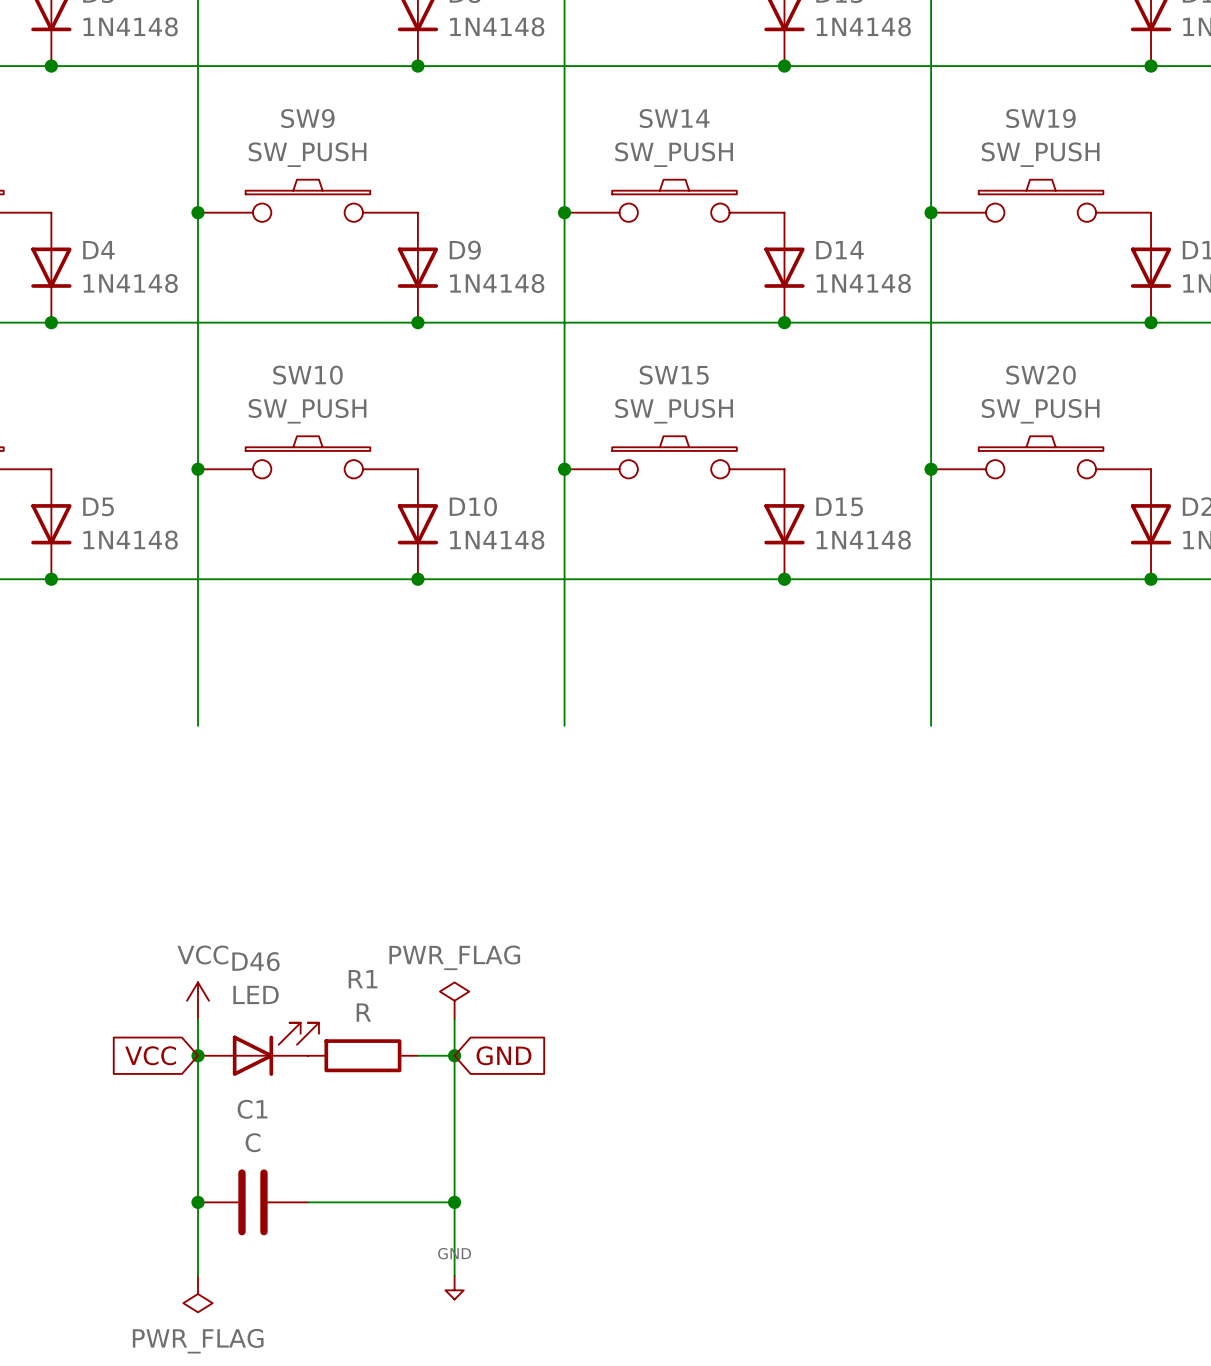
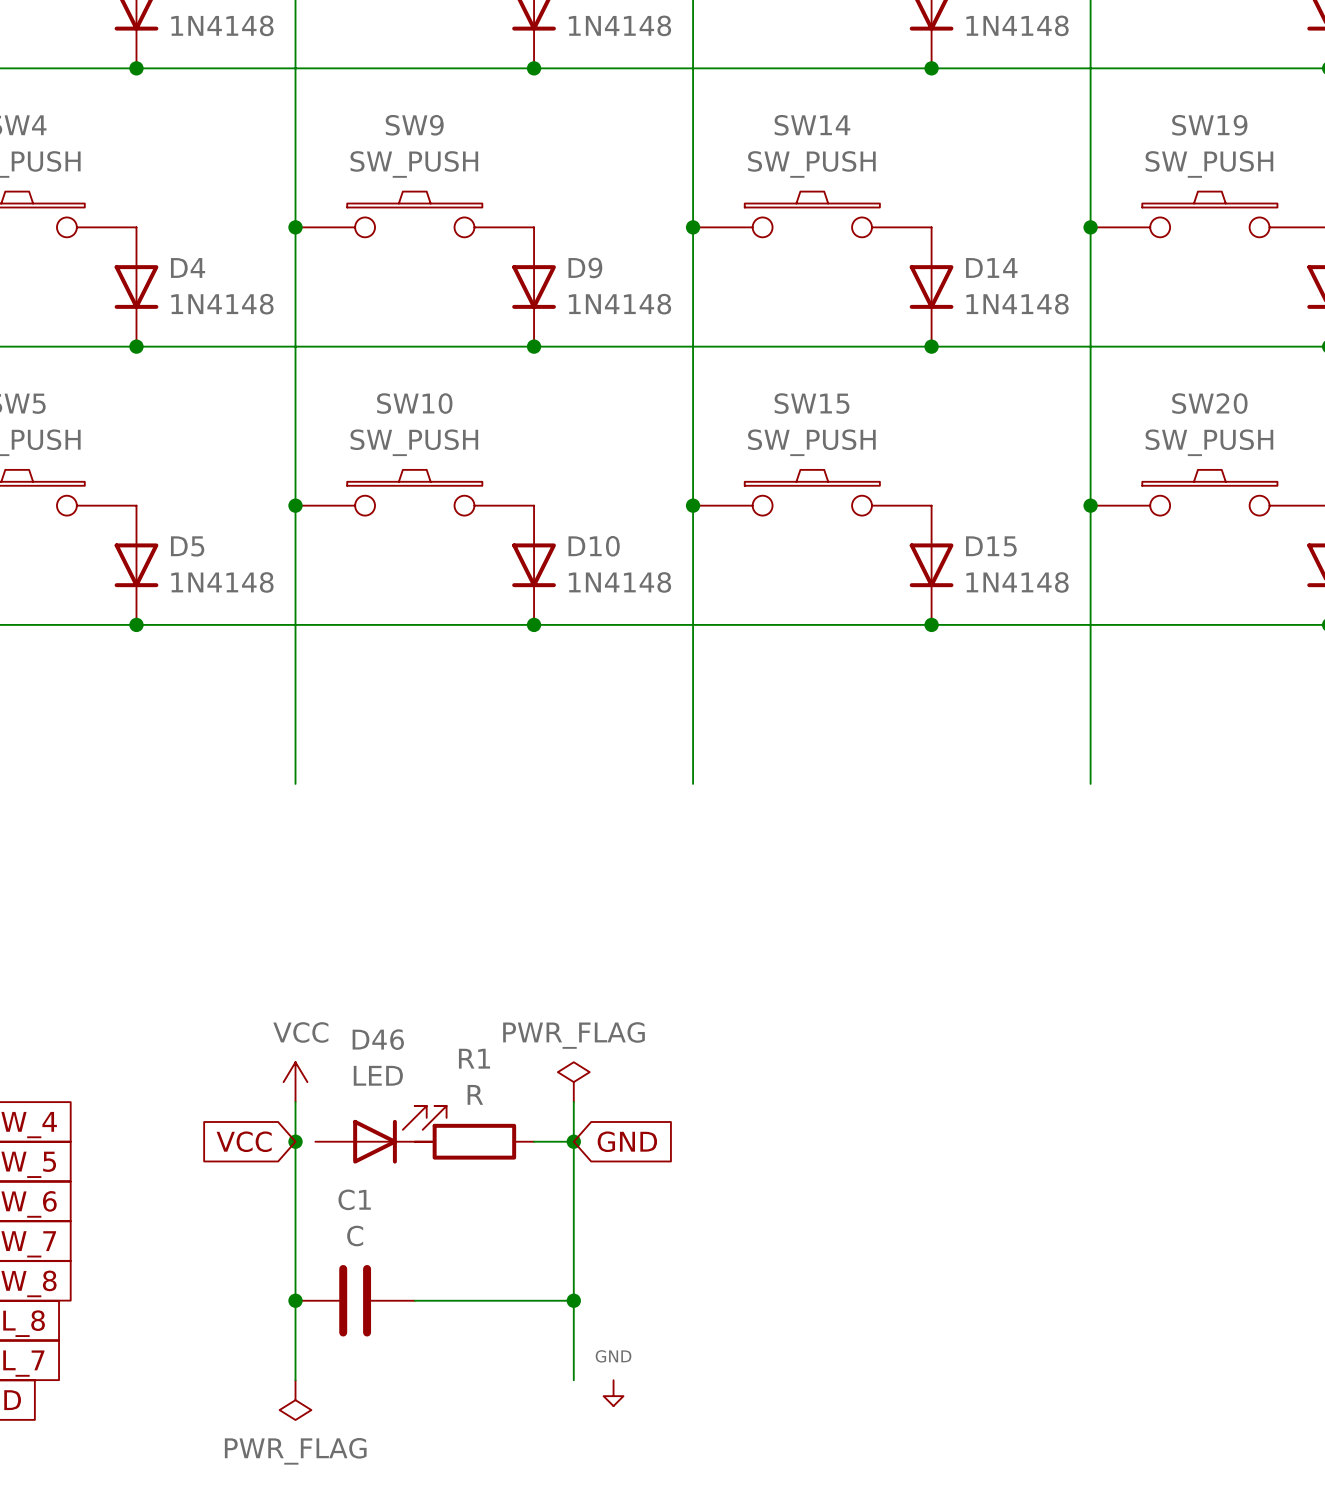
D46 position: (258, 1049) -> (380, 1134)
power symbol position: GND (454, 1287) -> GND (613, 1393)

